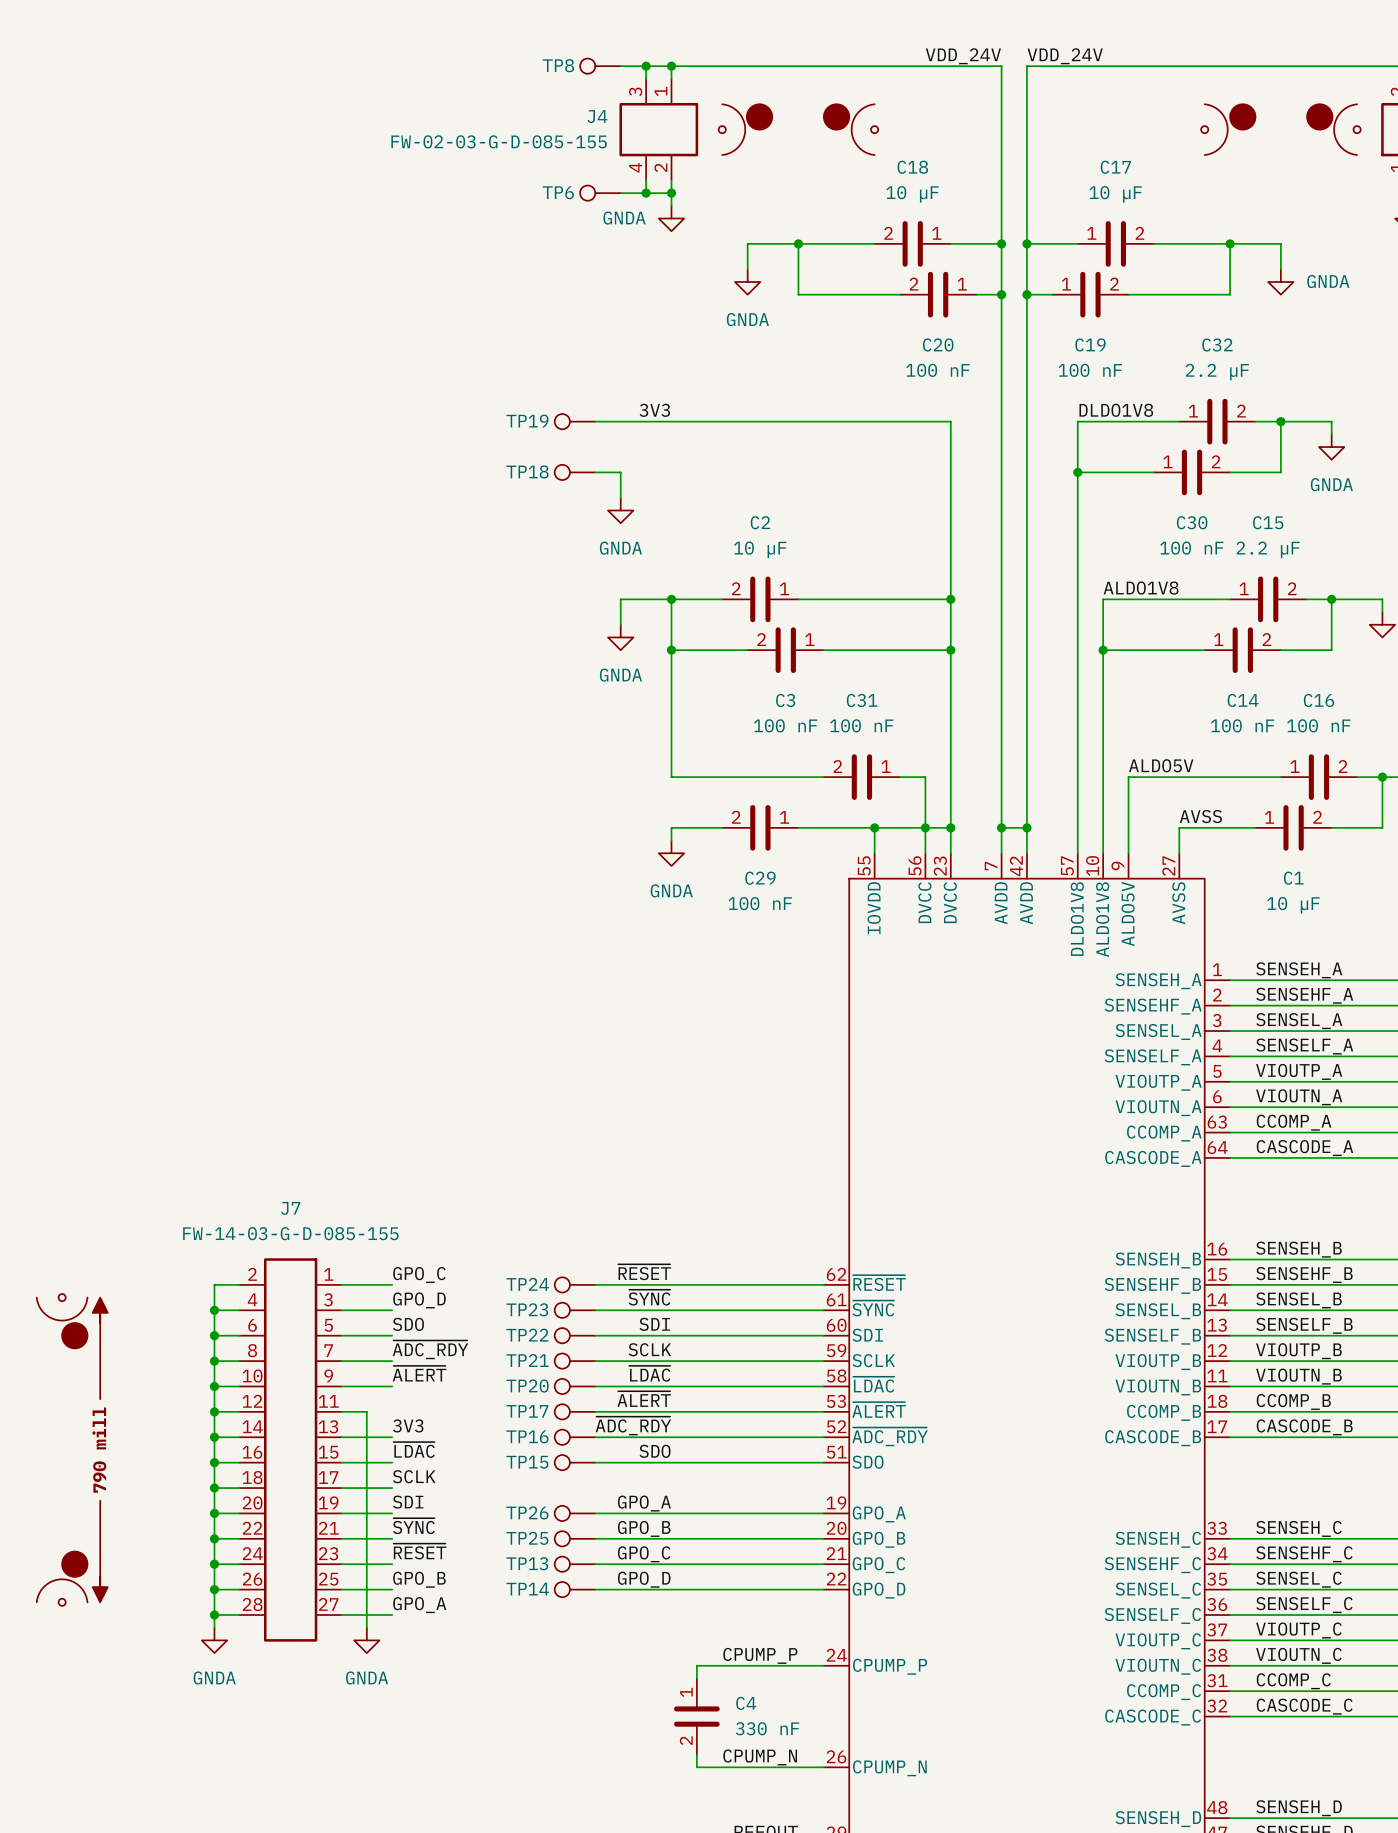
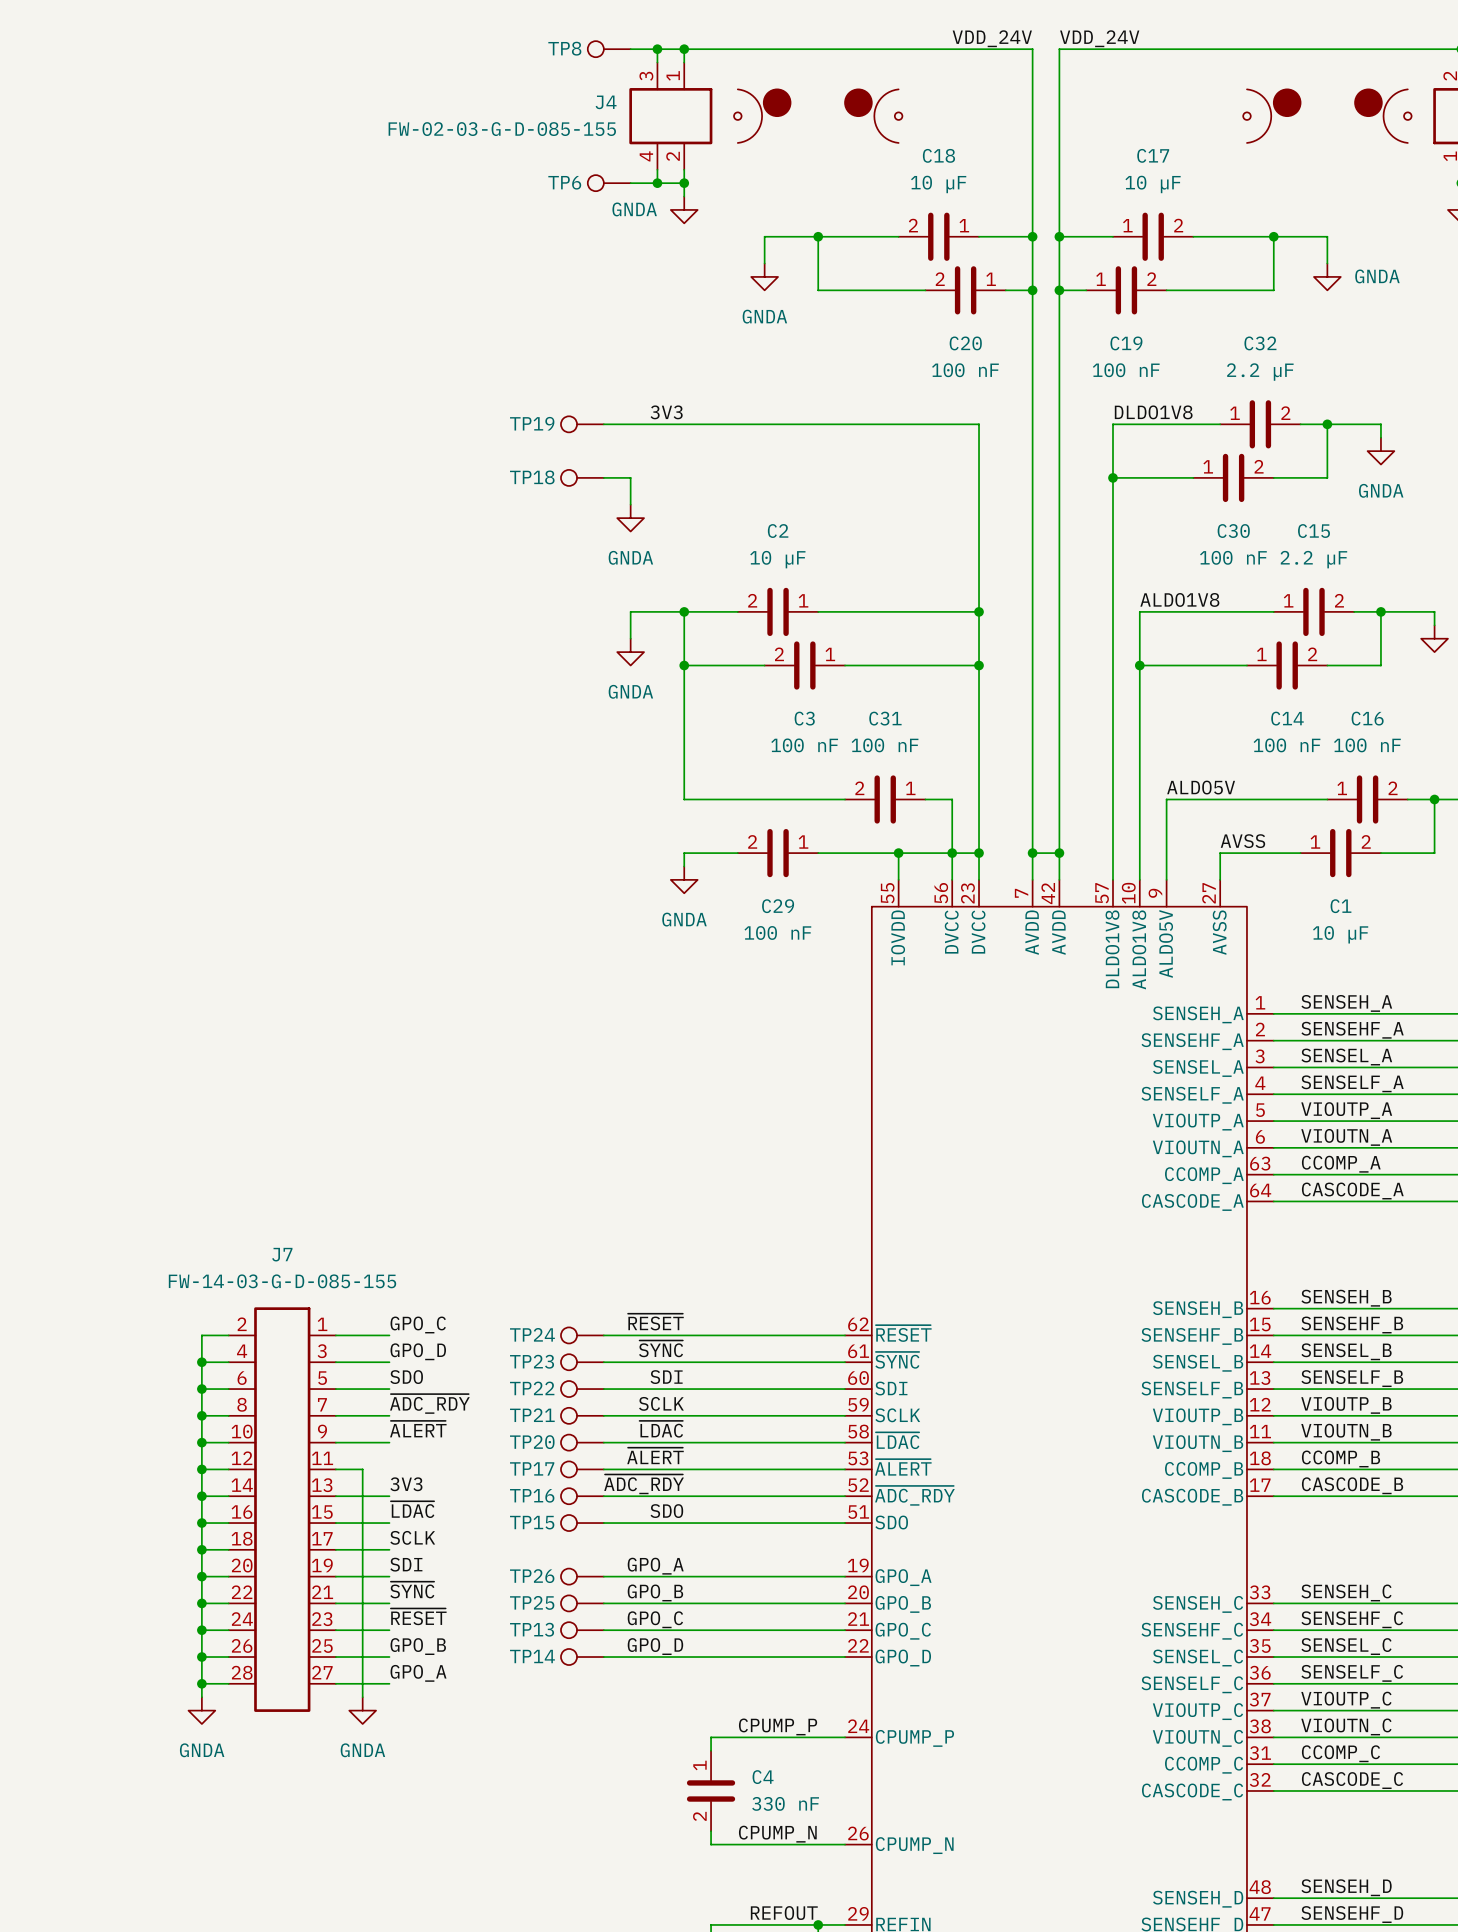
part: (72, 1449) -> none

